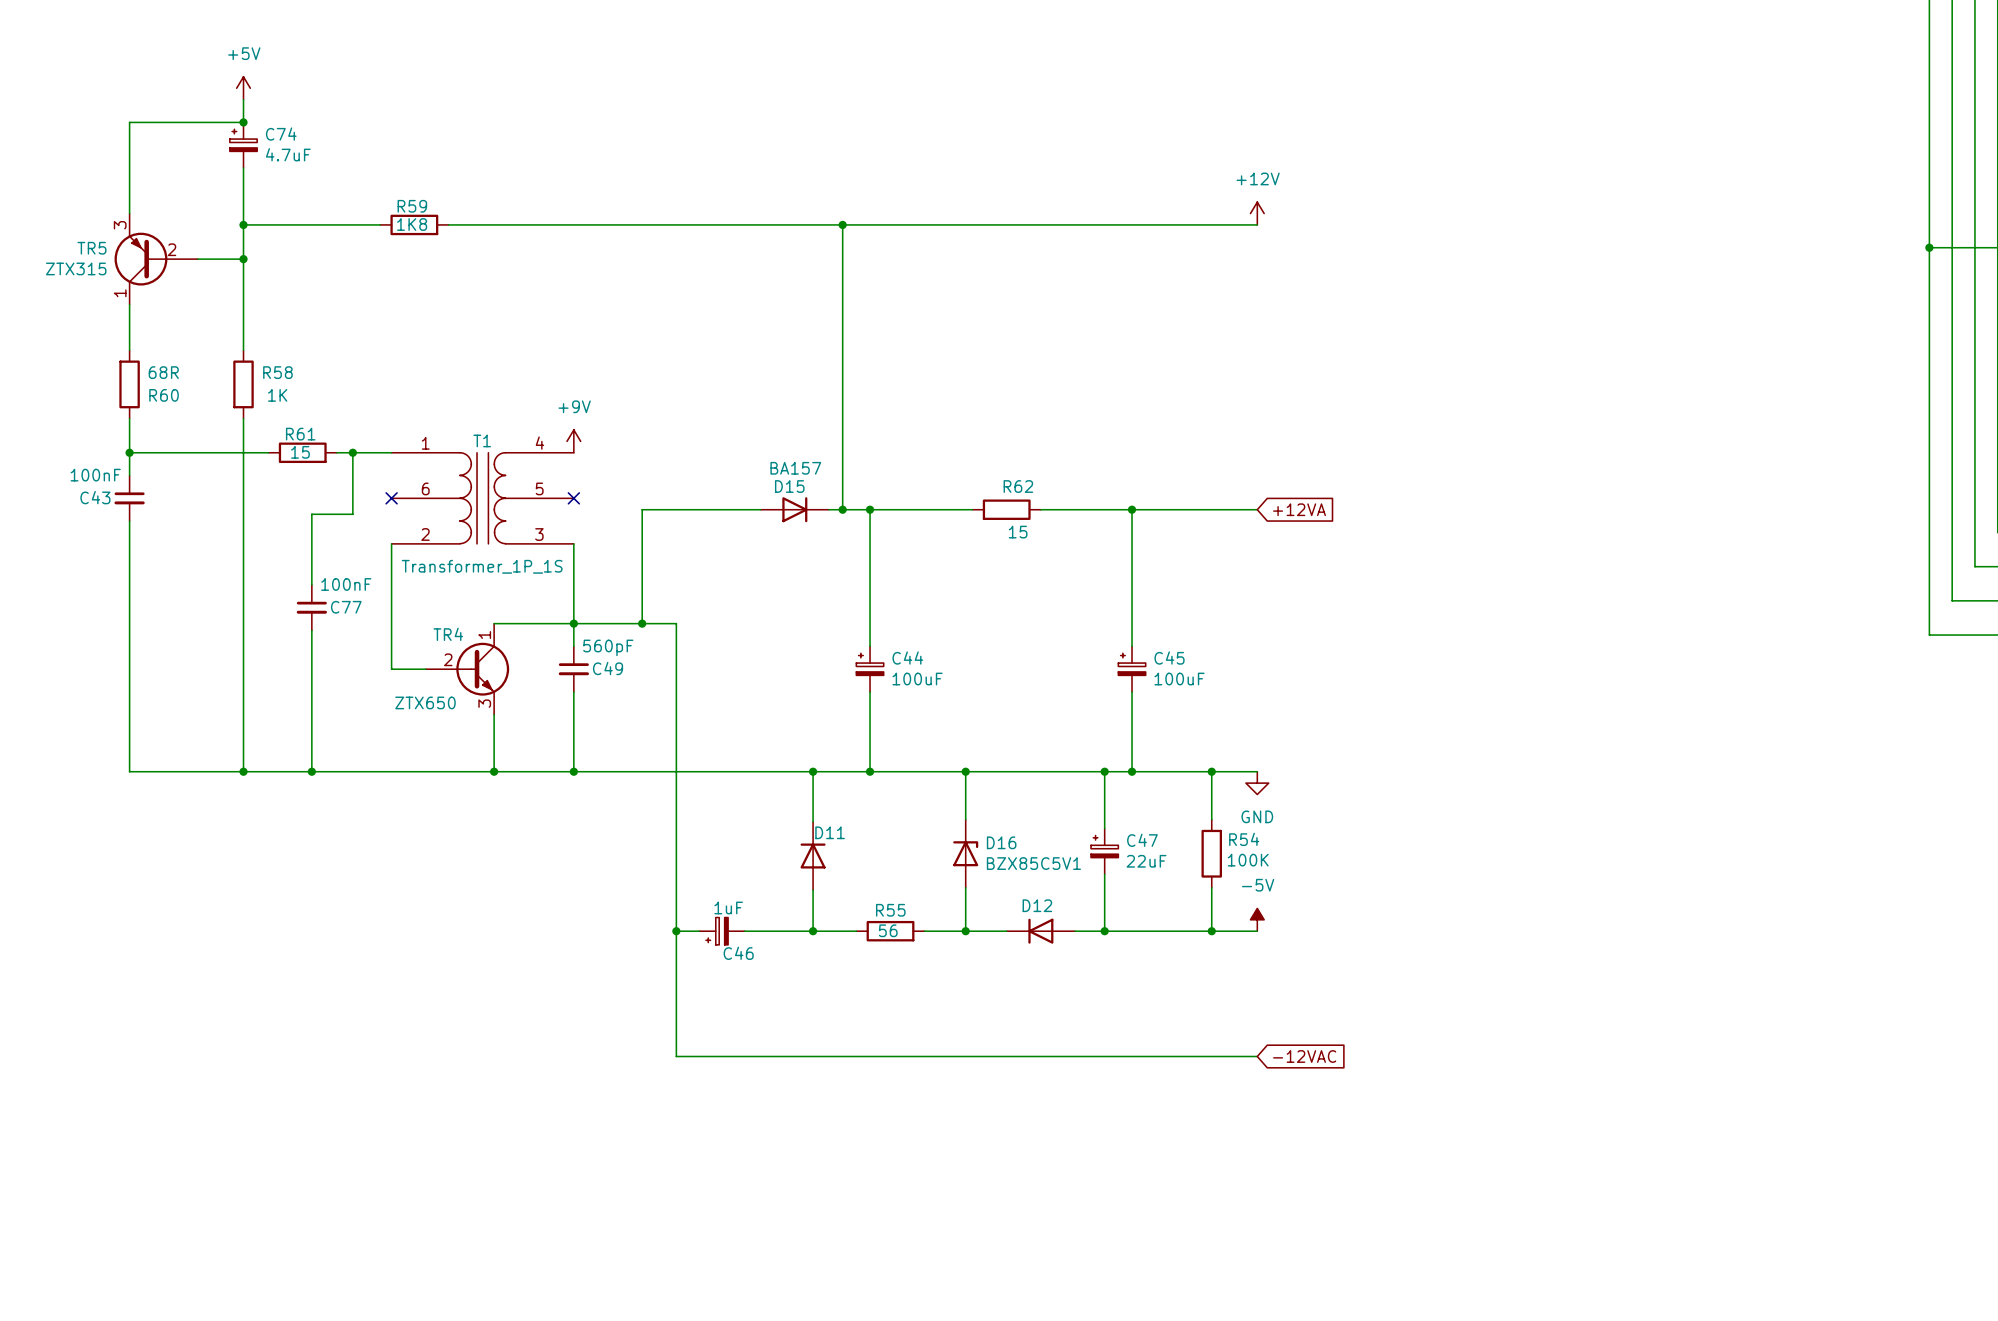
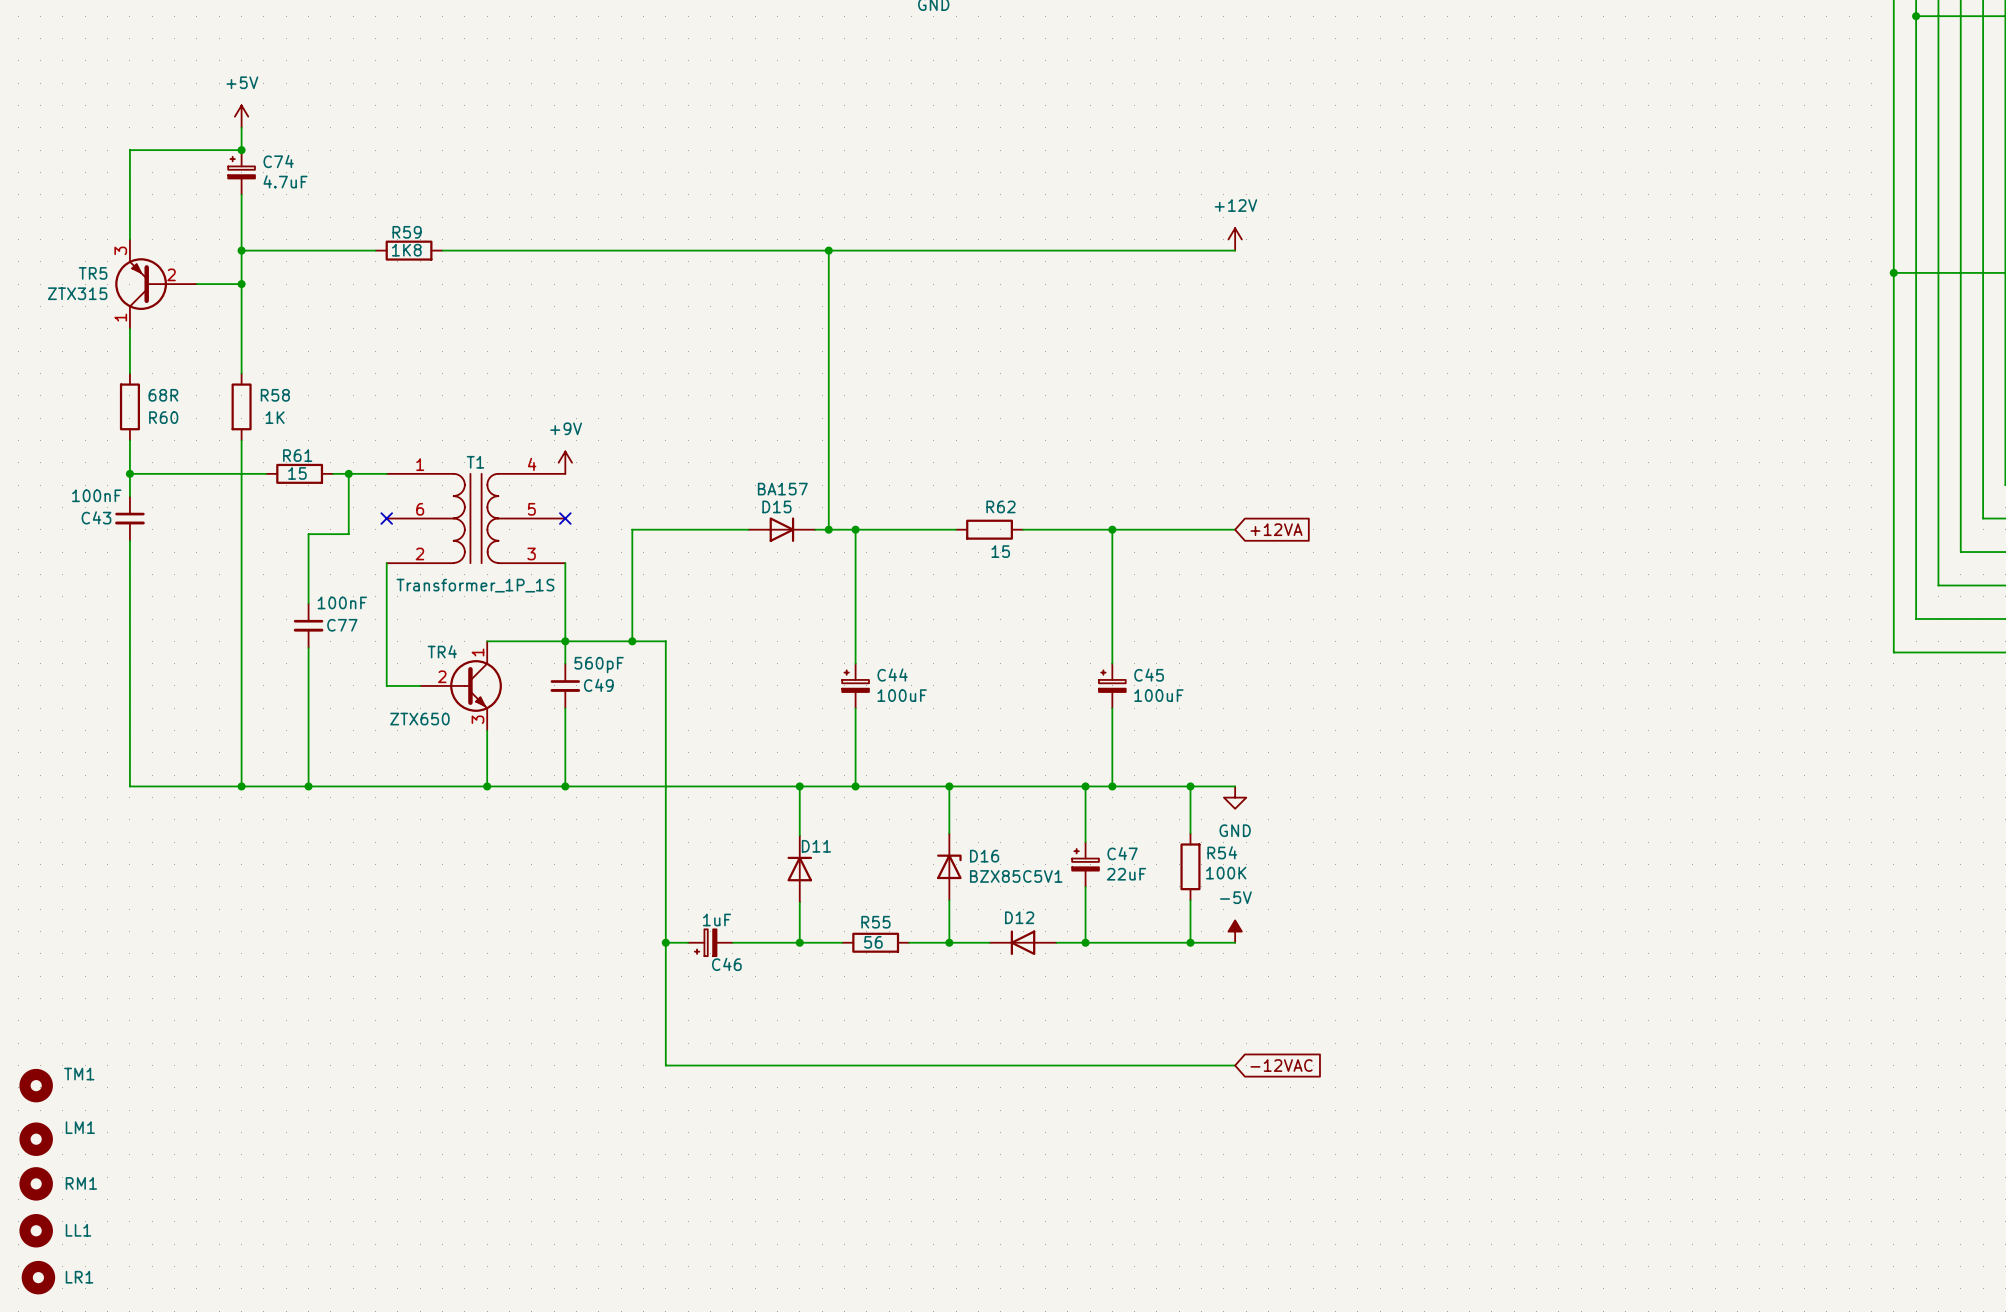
TM1: none -> (36, 1085)
LM1: none -> (36, 1139)
RM1: none -> (36, 1183)
LL1: none -> (36, 1230)
LR1: none -> (38, 1277)

